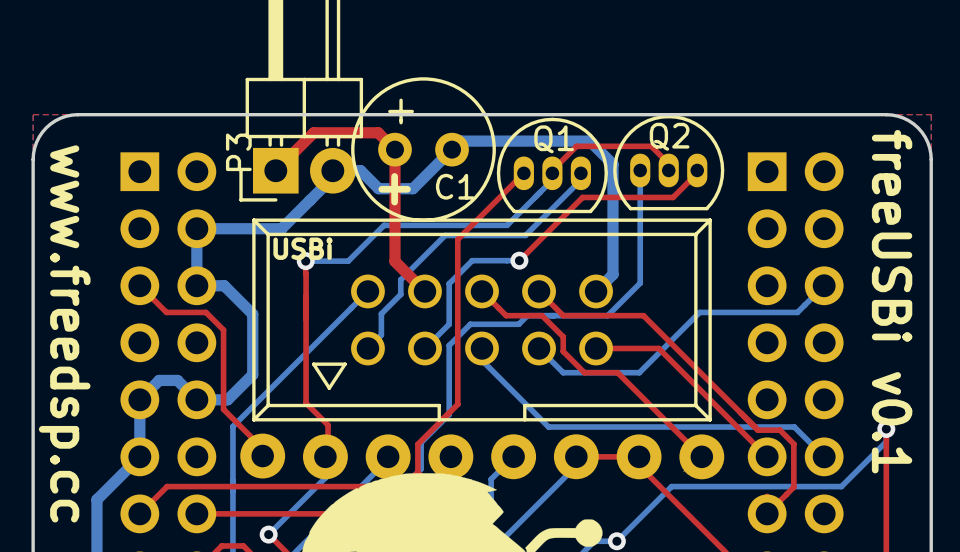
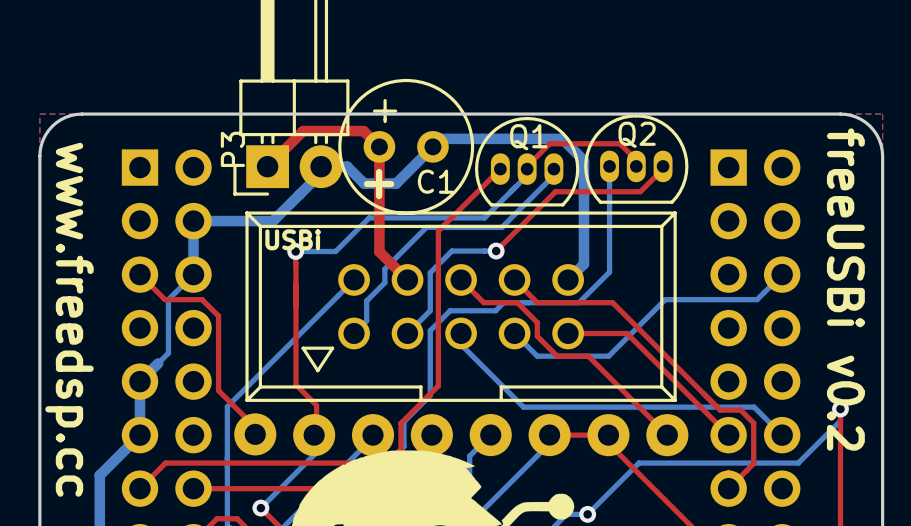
bottom track: (196, 285) (224, 285) (252, 314) (252, 374) (227, 399) (196, 399) (177, 380) (159, 380) -> (193, 274) (168, 299) (168, 353) (158, 363)
text: freeUSBi v0.1 (892, 301) -> freeUSBi v0.2 (845, 289)

